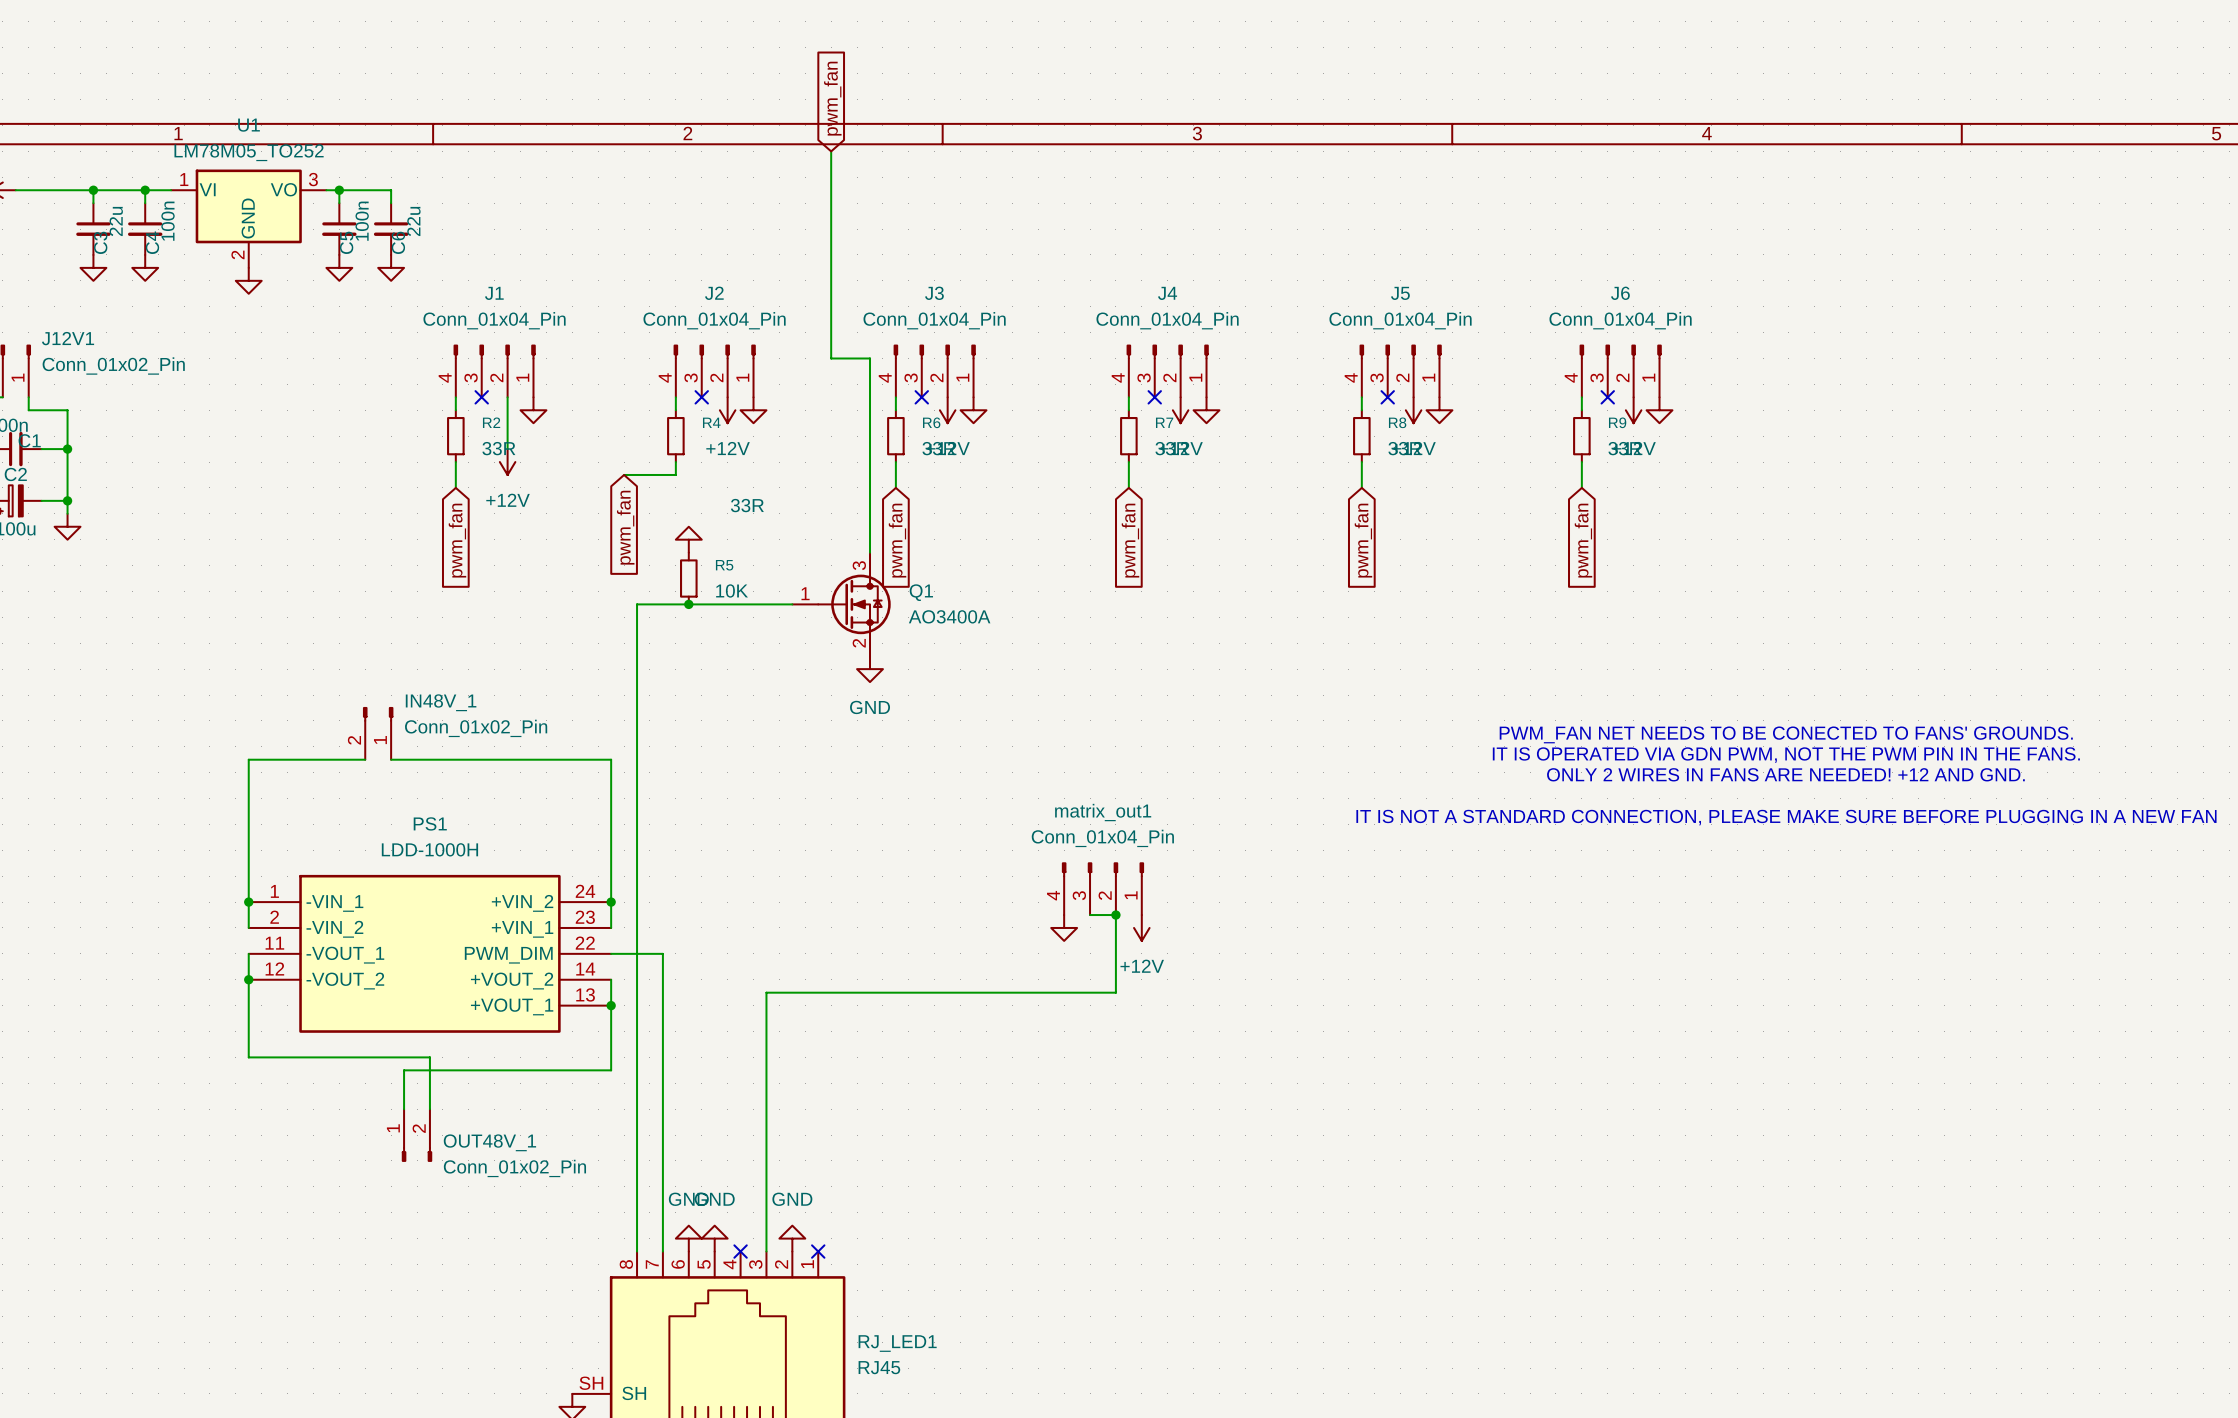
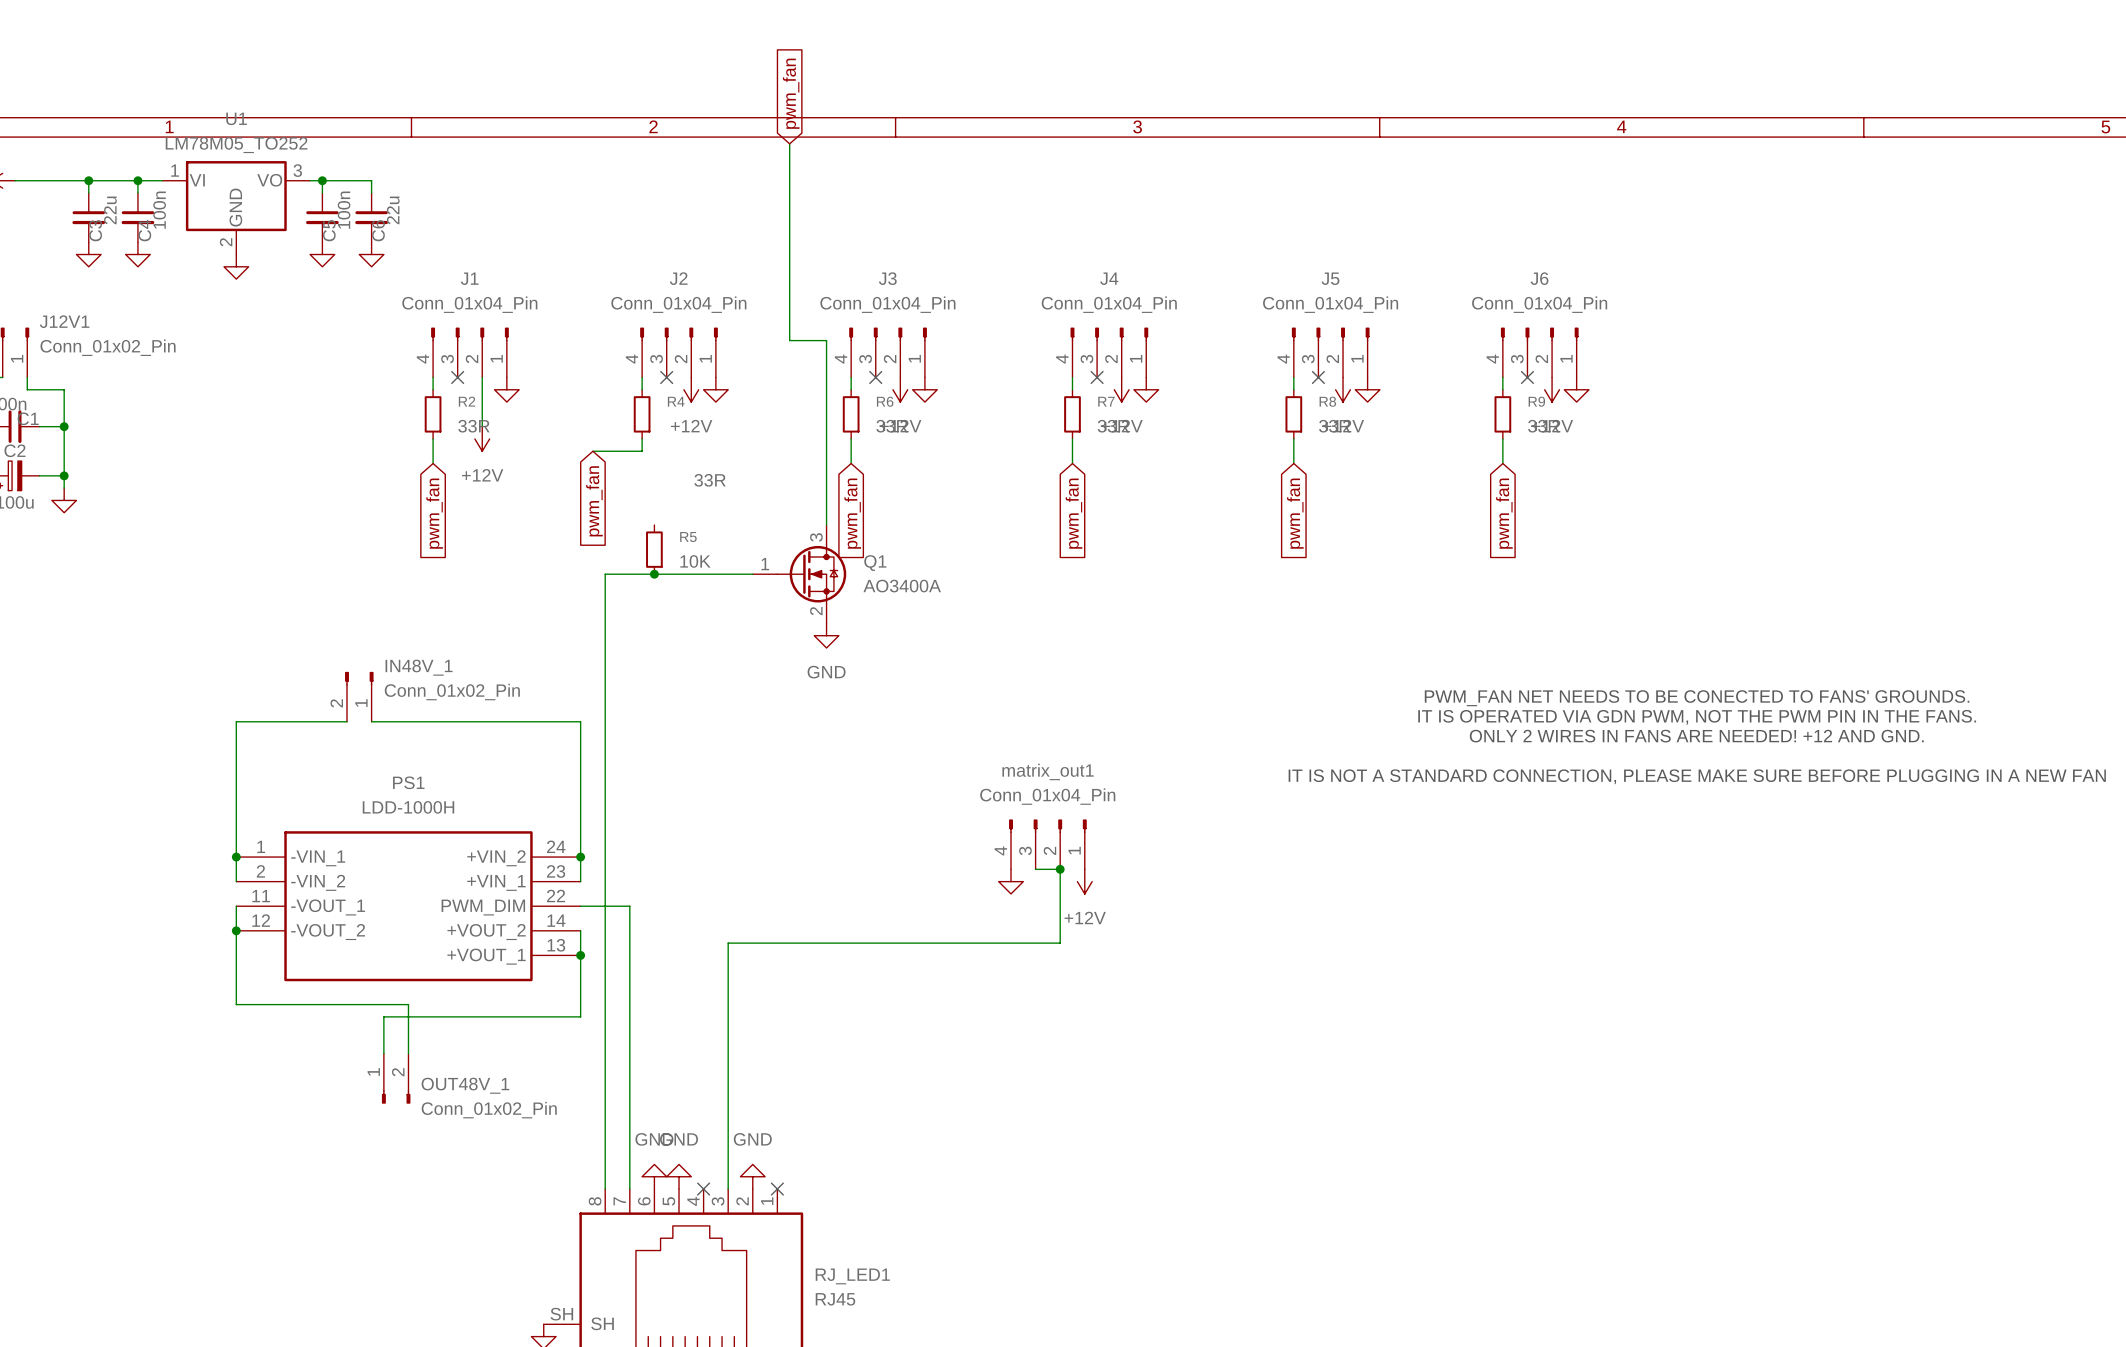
power symbol: (688, 539) -> none

